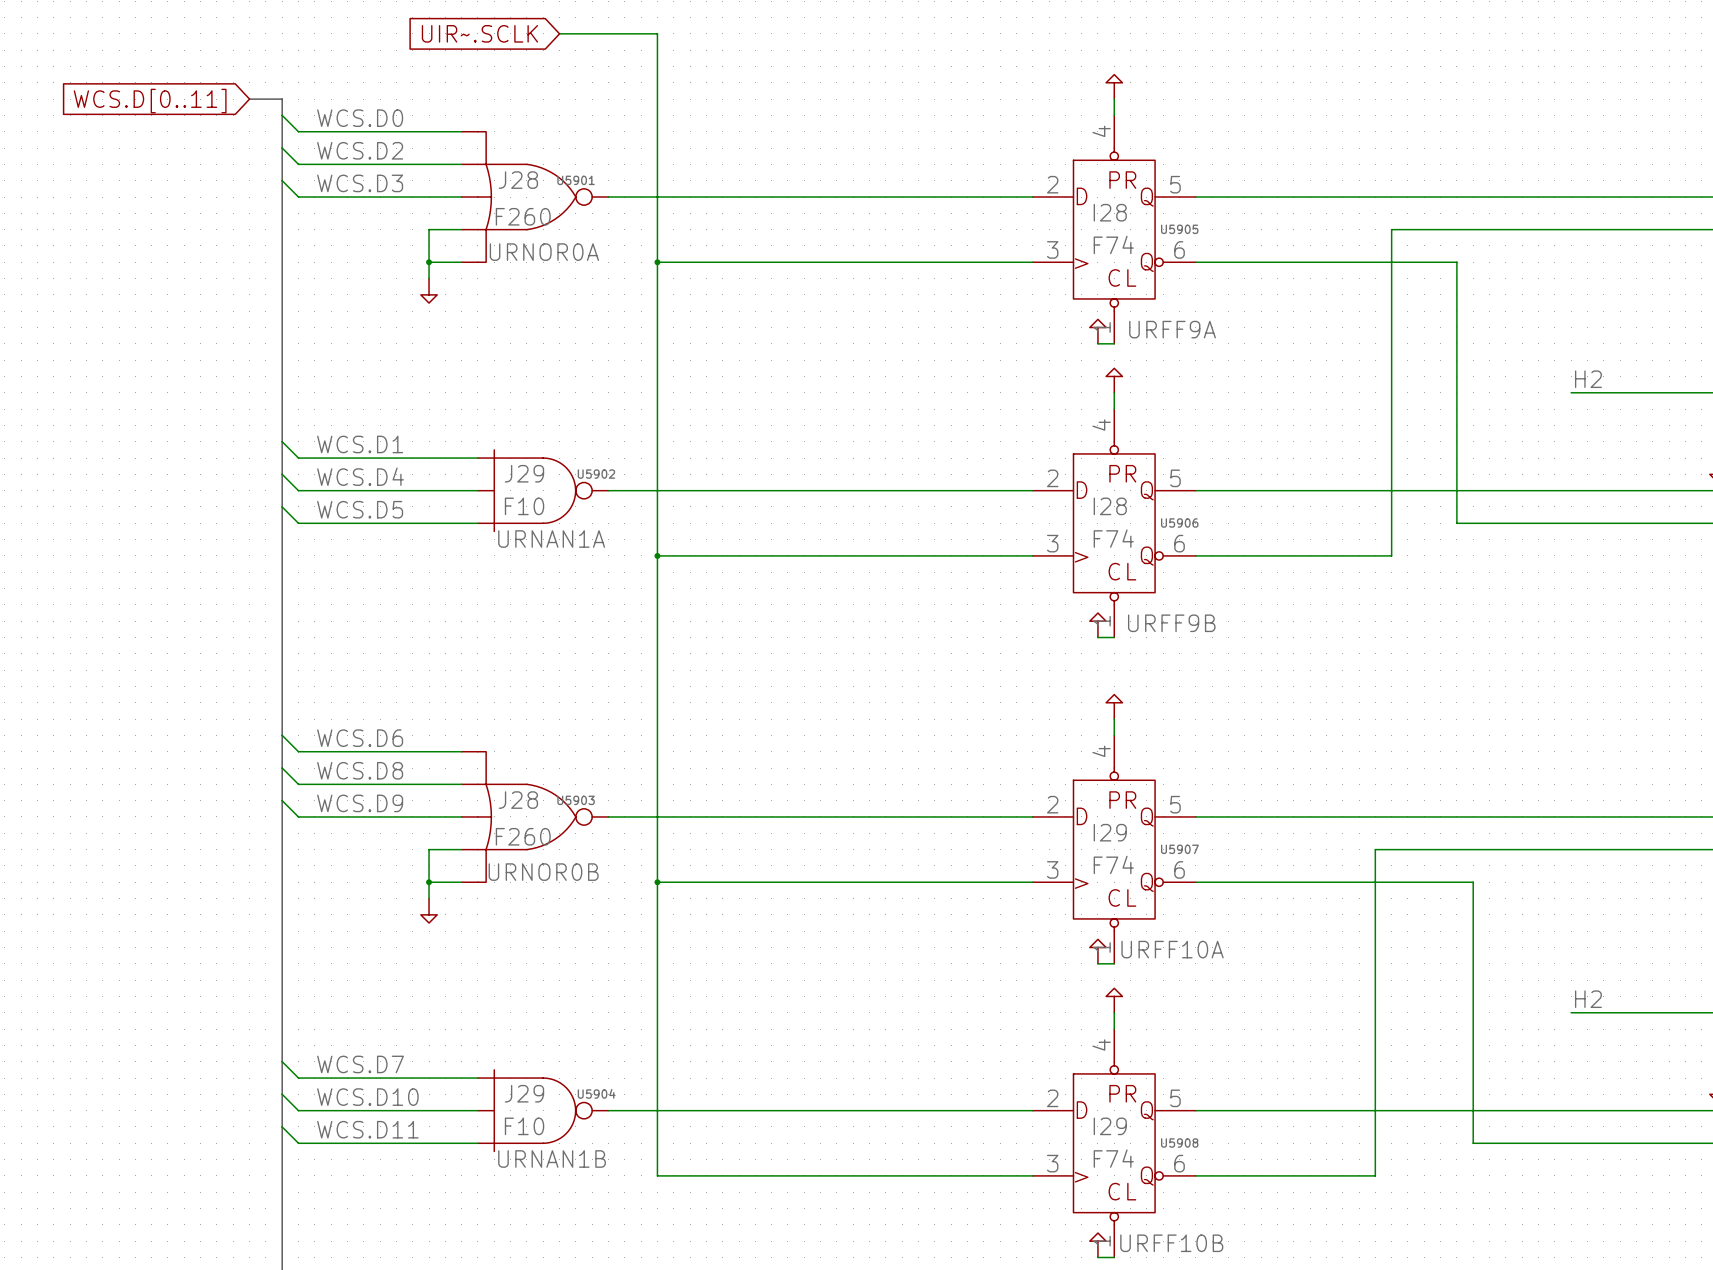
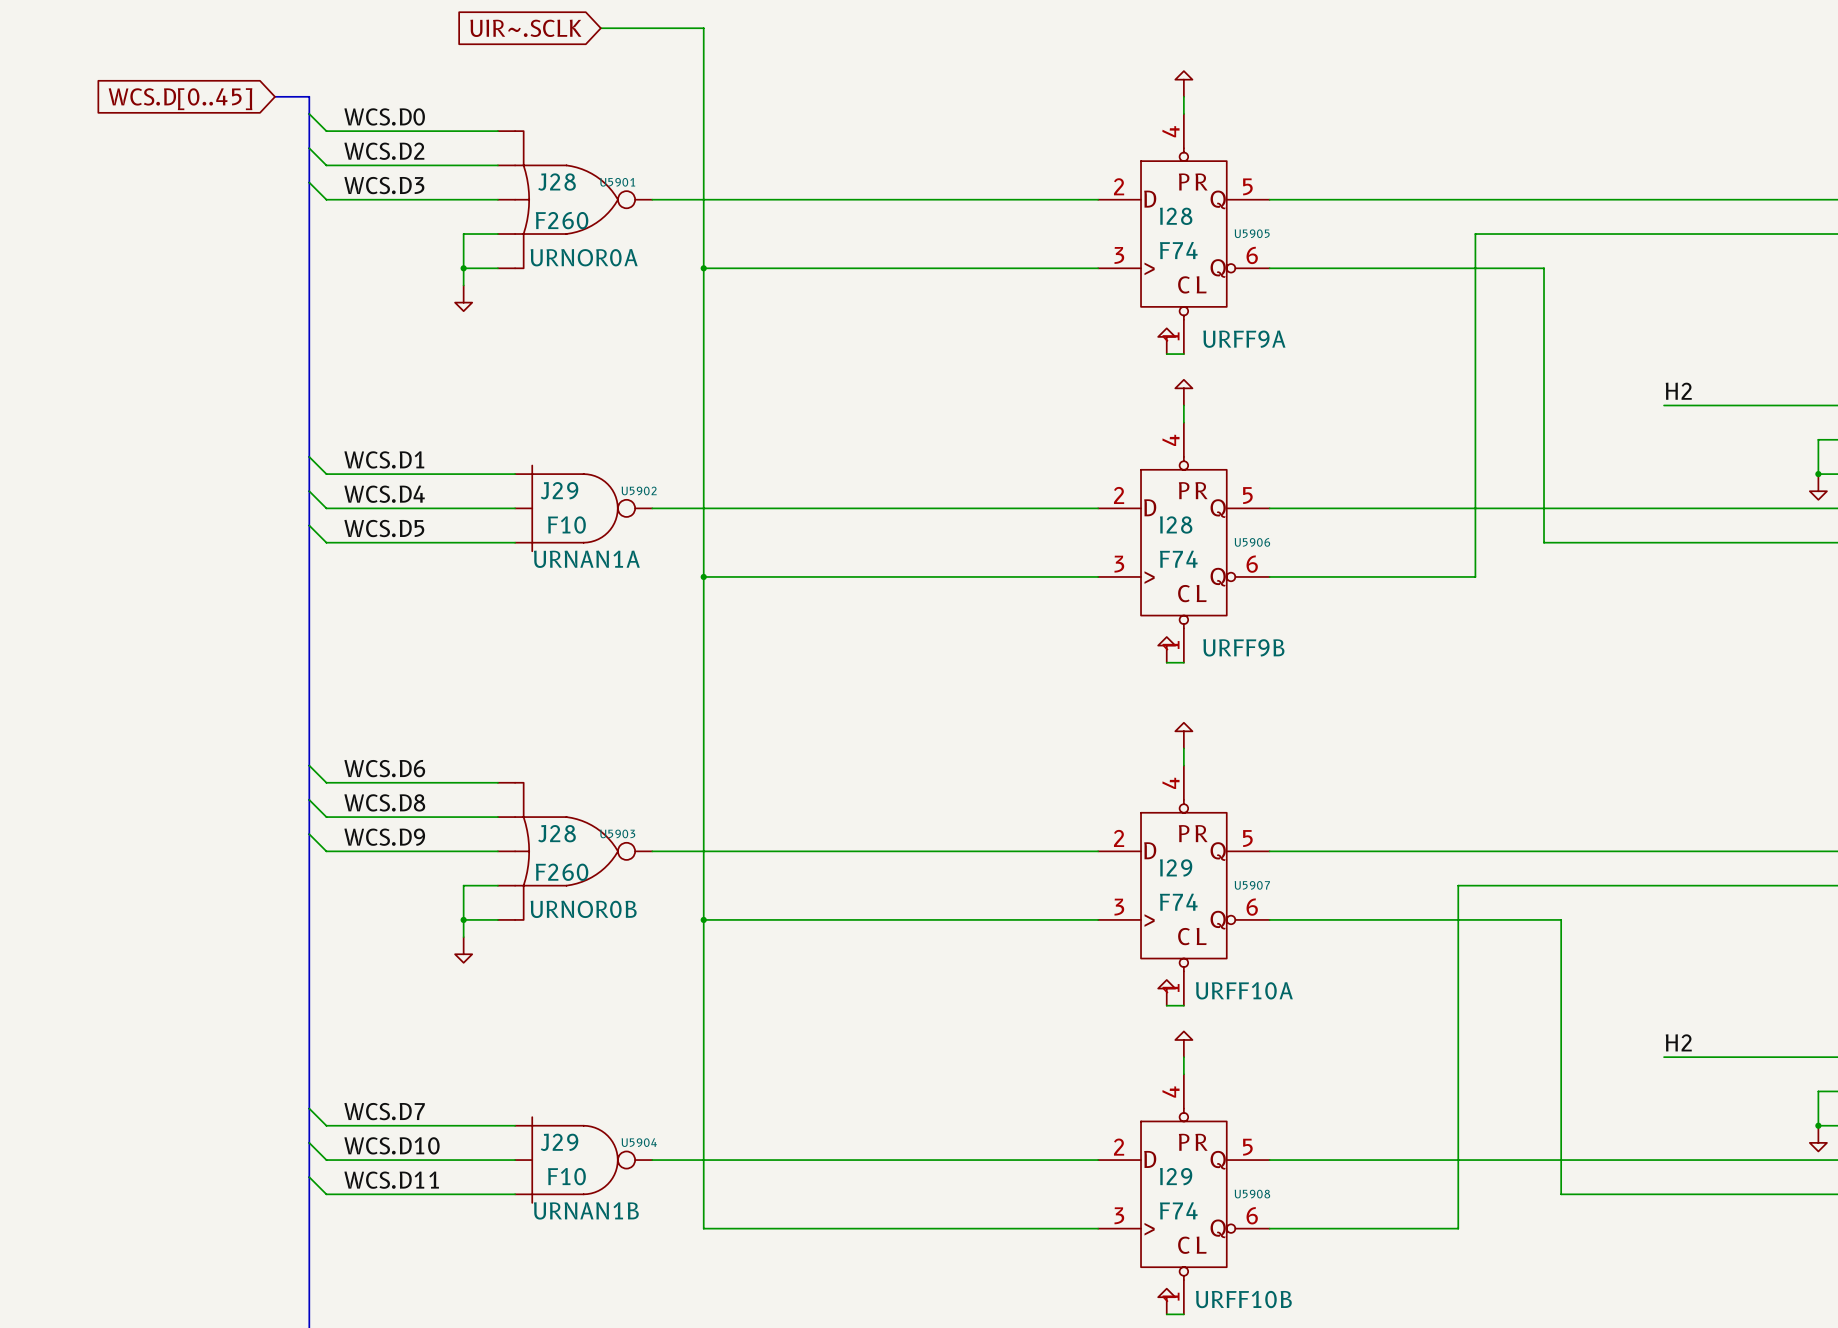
global label: WCS.D[0..11] (150, 101) -> WCS.D[0..45] (180, 99)

